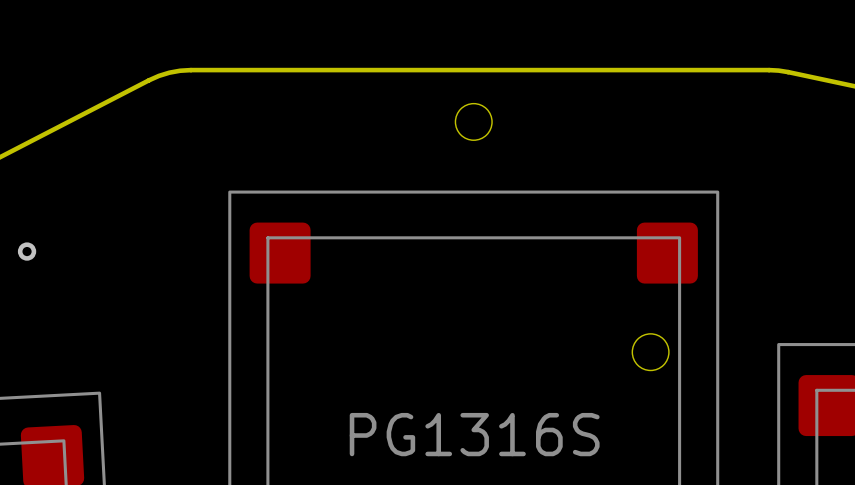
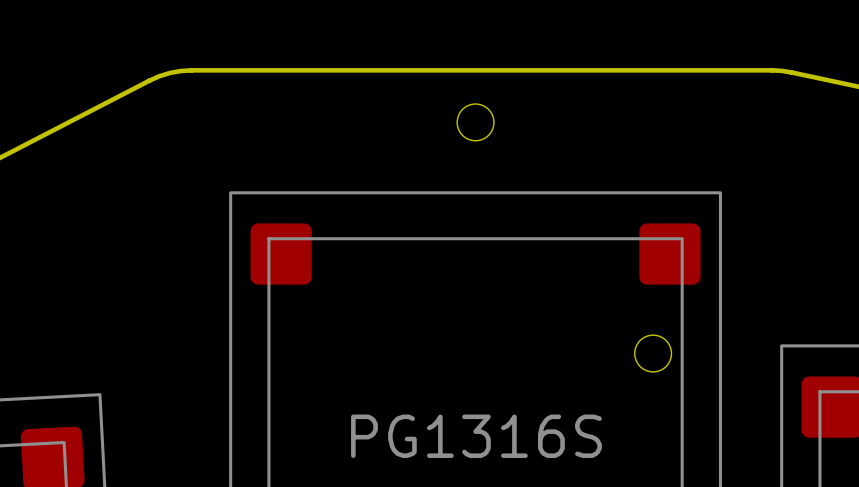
via: (27, 251) -> none

